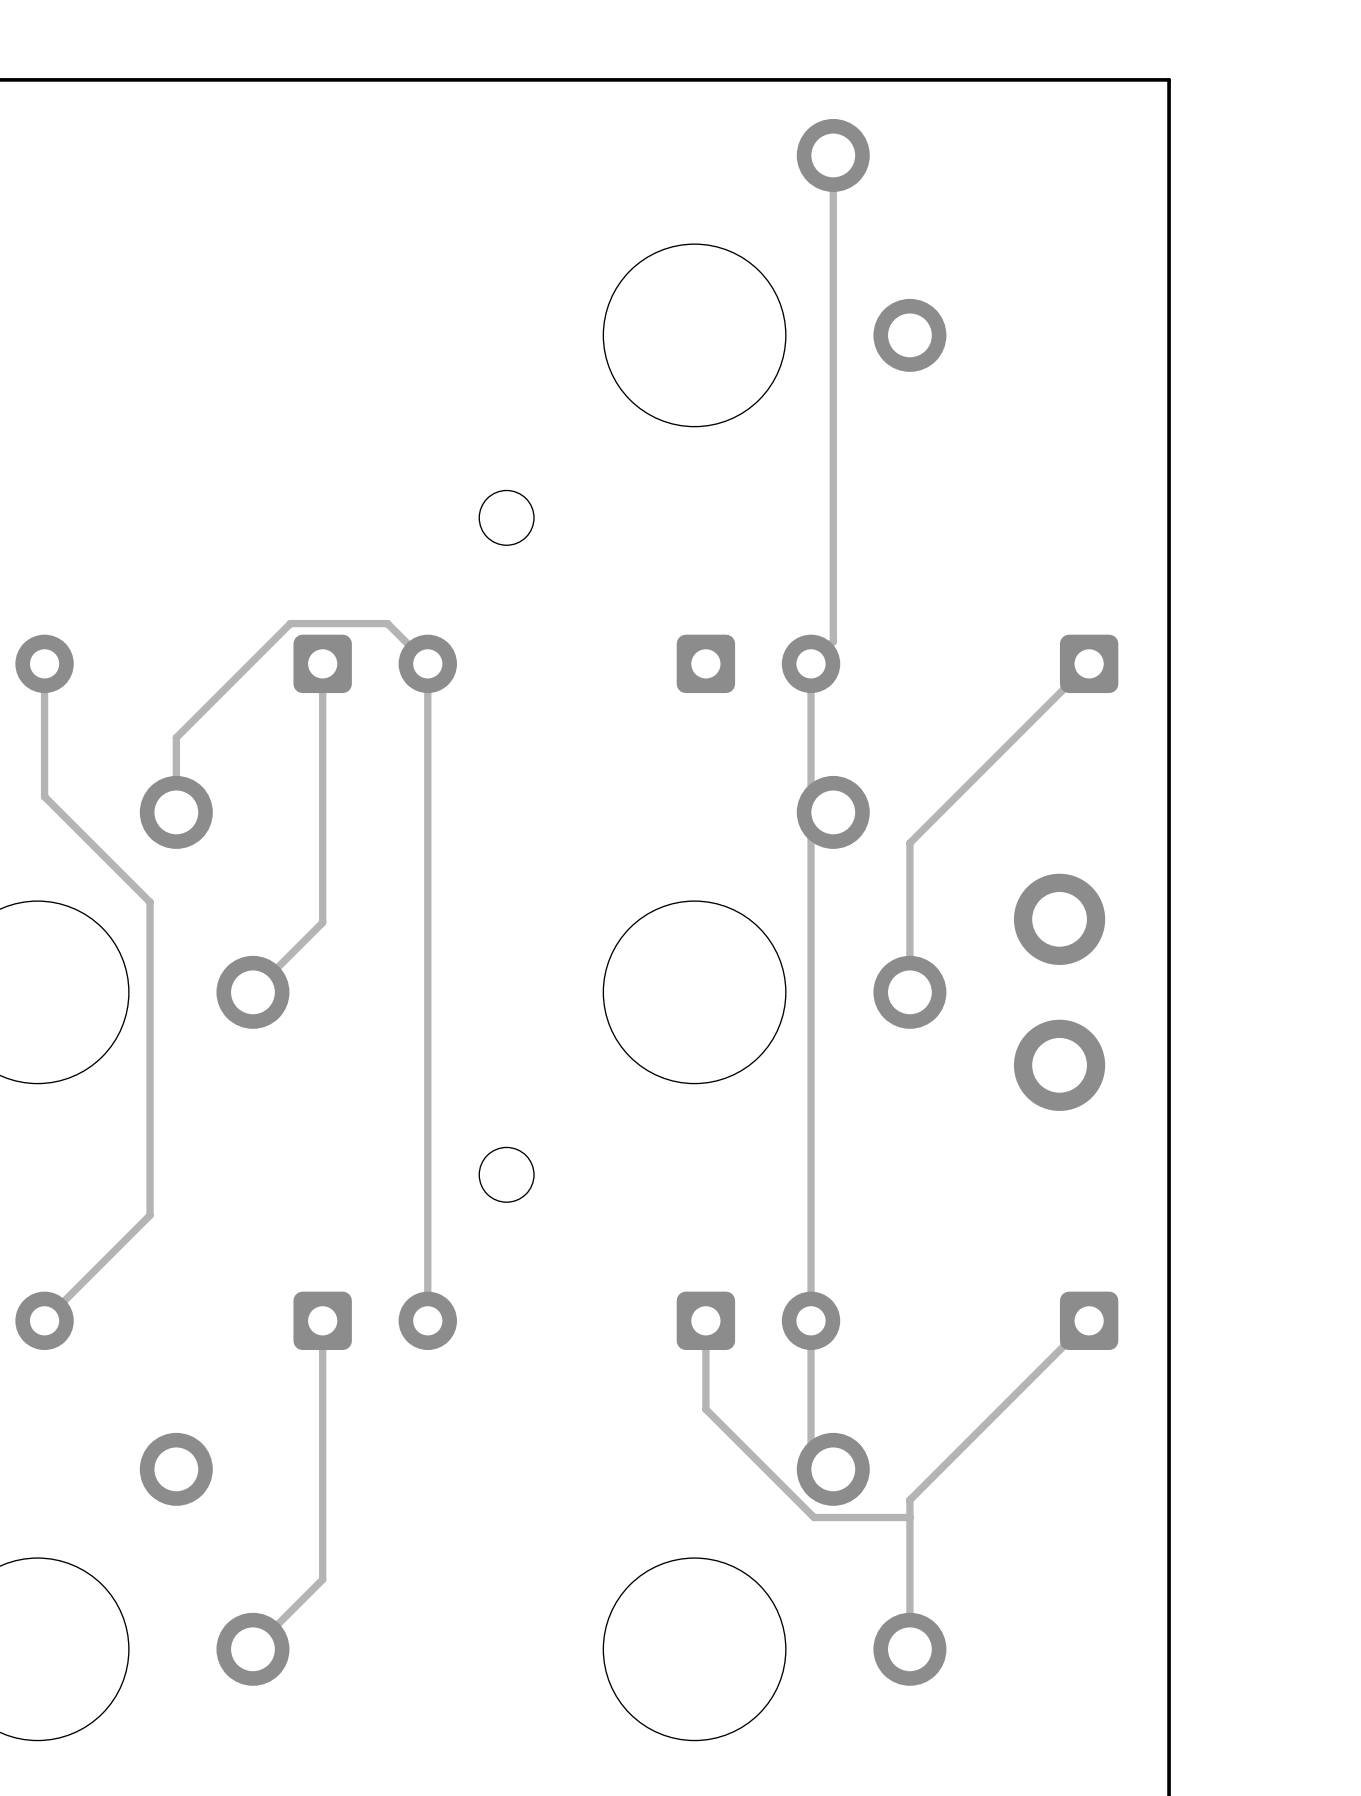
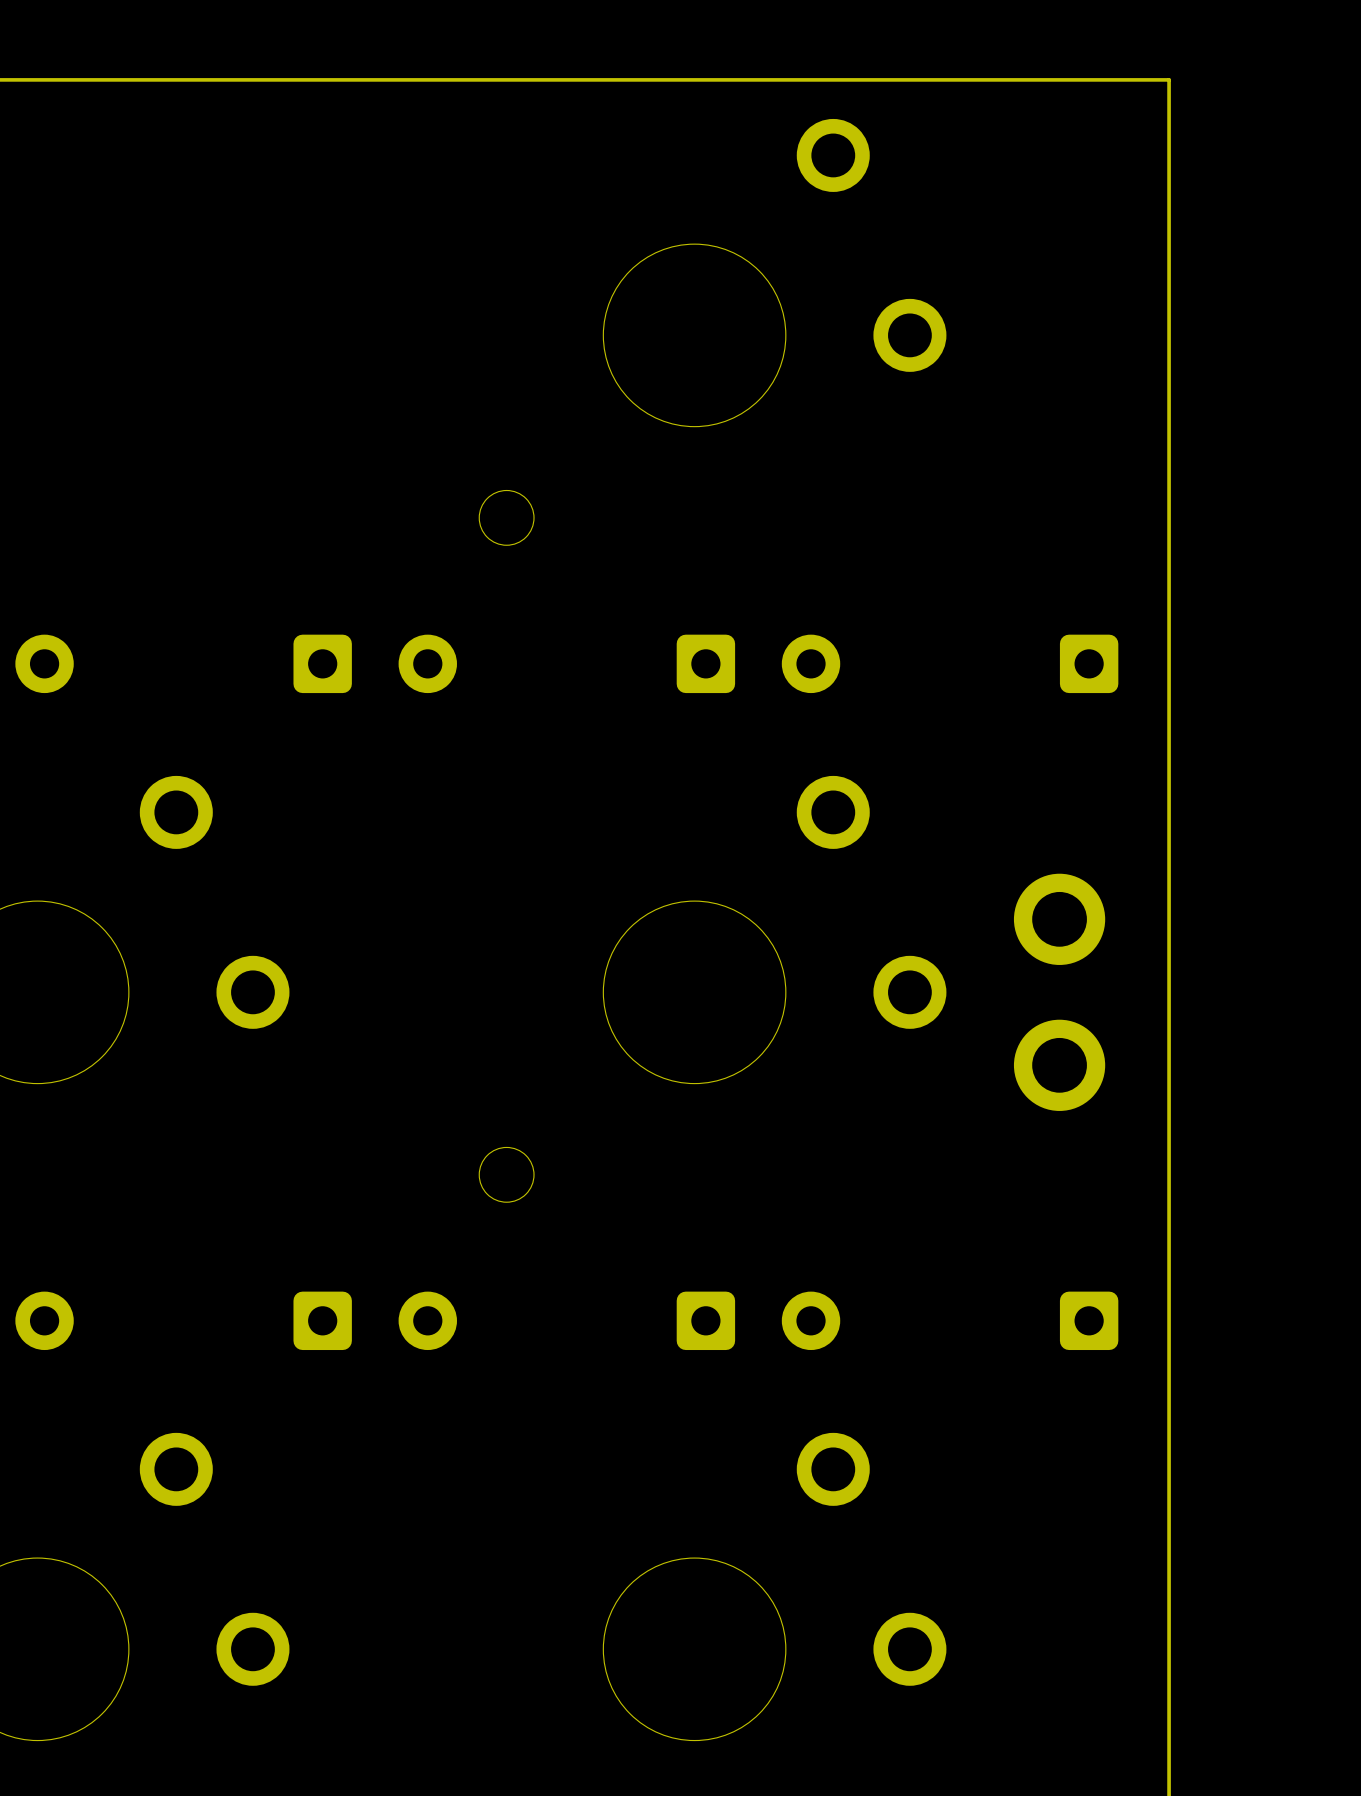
track: (833, 155) (833, 641) (811, 663) (811, 790) (833, 812) (811, 834) (811, 1447) (833, 1469) -> none
track: (44, 663) (44, 796) (150, 902) (150, 1215) (44, 1320) -> none
track: (322, 663) (322, 922) (252, 992) -> none
track: (1089, 663) (909, 843) (909, 992) -> none
track: (176, 812) (176, 737) (290, 623) (387, 623) (427, 663) (427, 1320) -> none
track: (322, 1320) (322, 1579) (252, 1649) -> none
track: (705, 1320) (705, 1409) (814, 1517) (909, 1517) -> none
track: (1089, 1320) (909, 1500) (909, 1649) -> none

